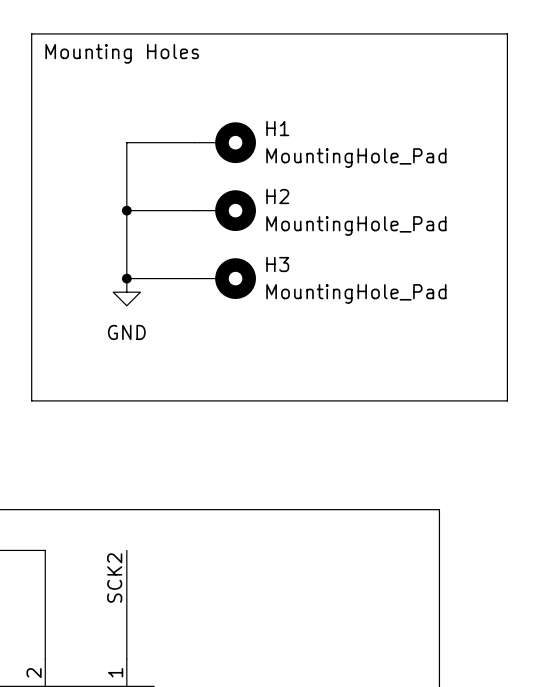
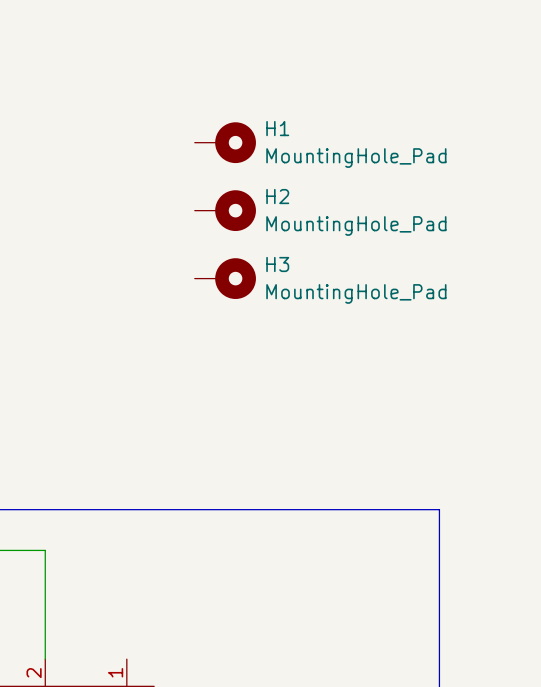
line: (31, 33) (507, 33) (507, 400) (31, 400) (31, 33) -> none
text: Mounting Holes (122, 53) -> none
wire: (194, 142) (126, 142) (126, 278) (194, 278) -> none
wire: (126, 210) (194, 210) -> none
junction: (126, 210) -> none
junction: (126, 278) -> none
power symbol: GND (126, 292) -> none
wire: (126, 550) (126, 659) -> none
label: SCK2 (114, 578) -> none

